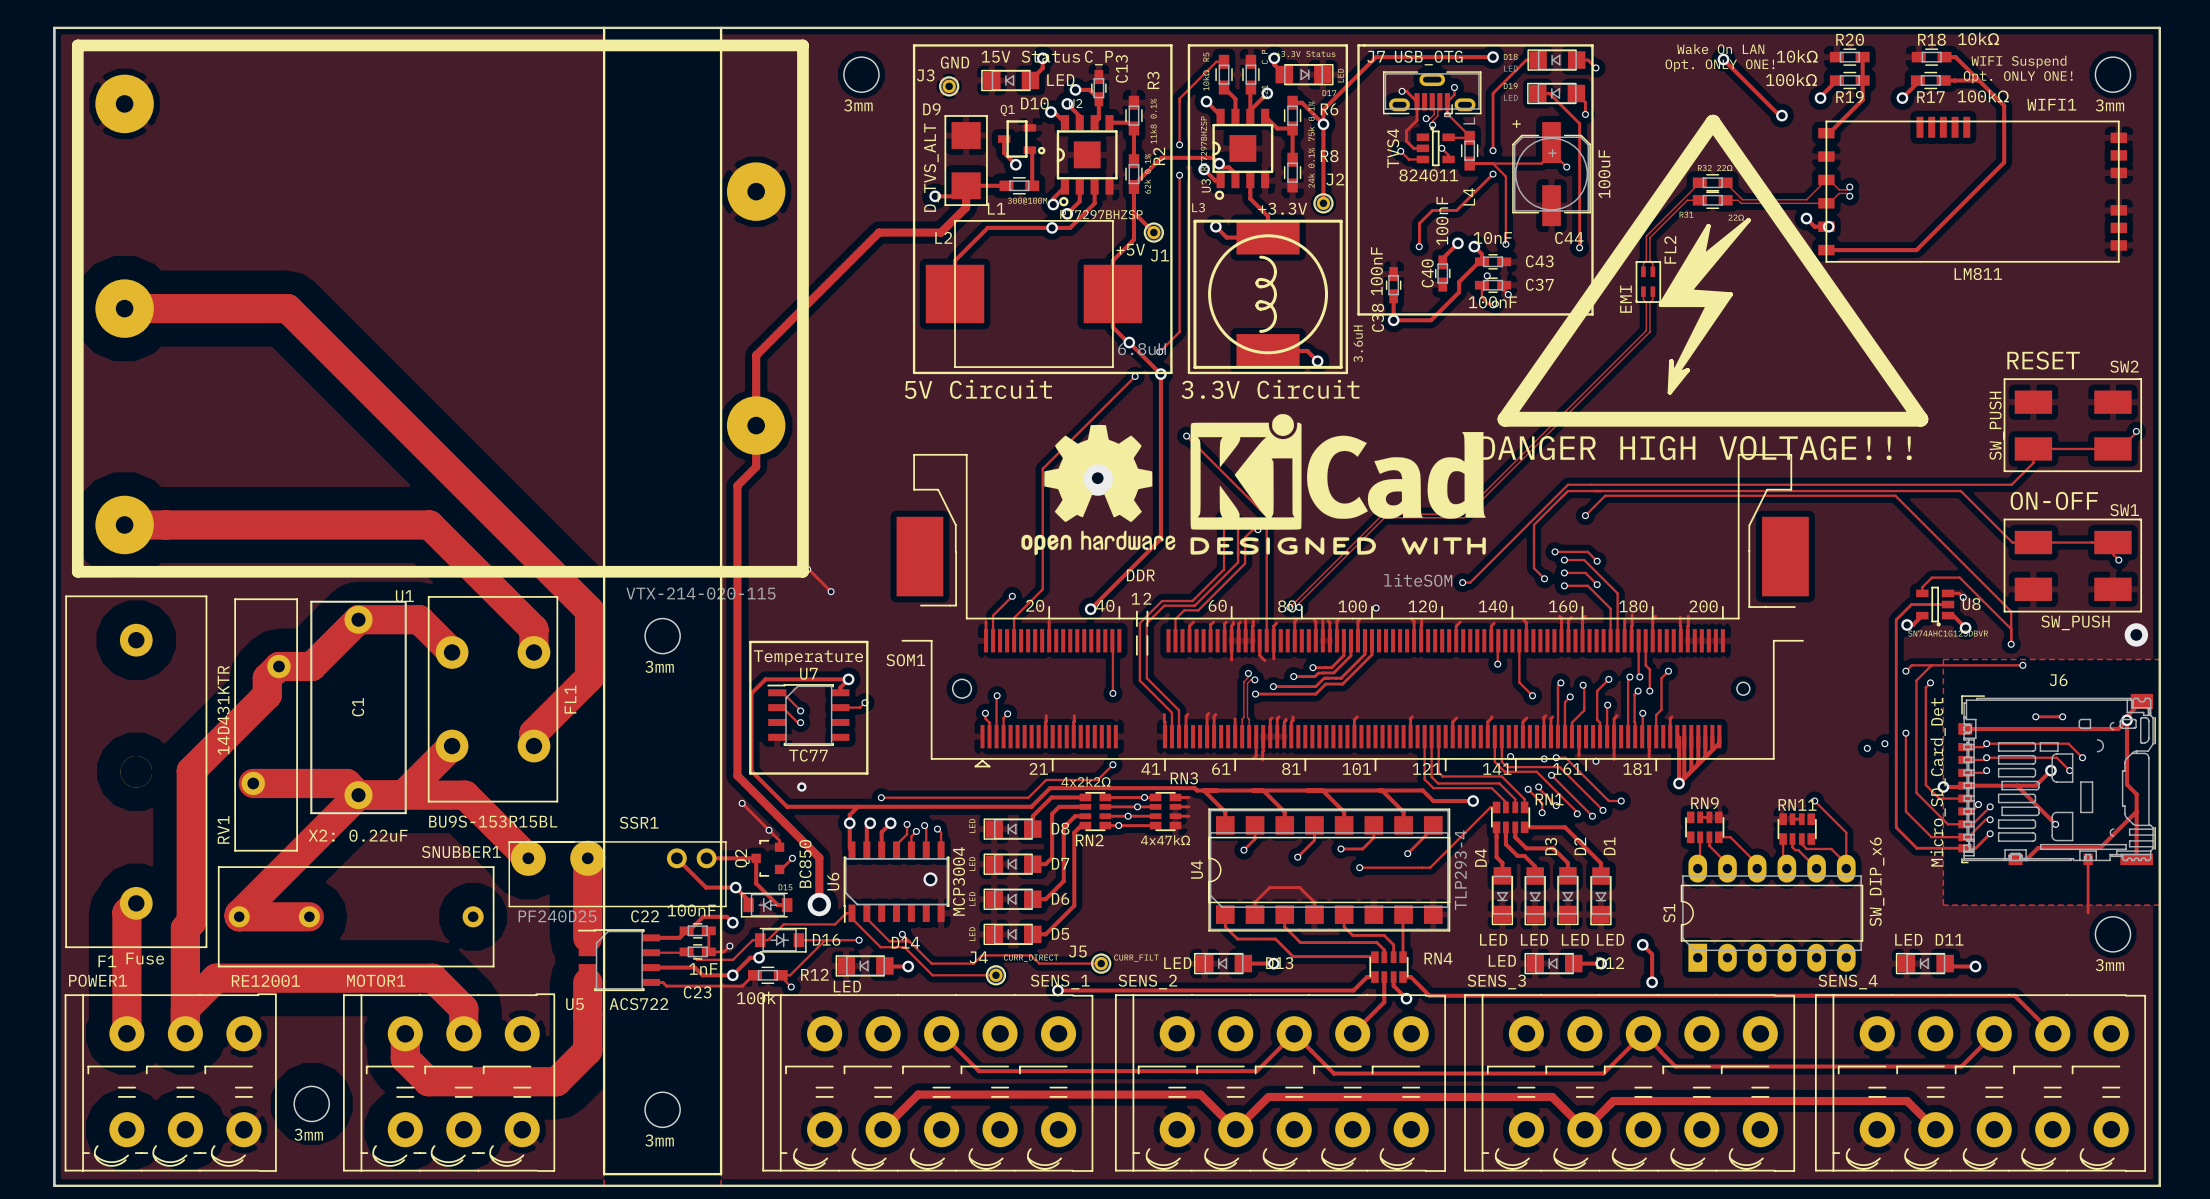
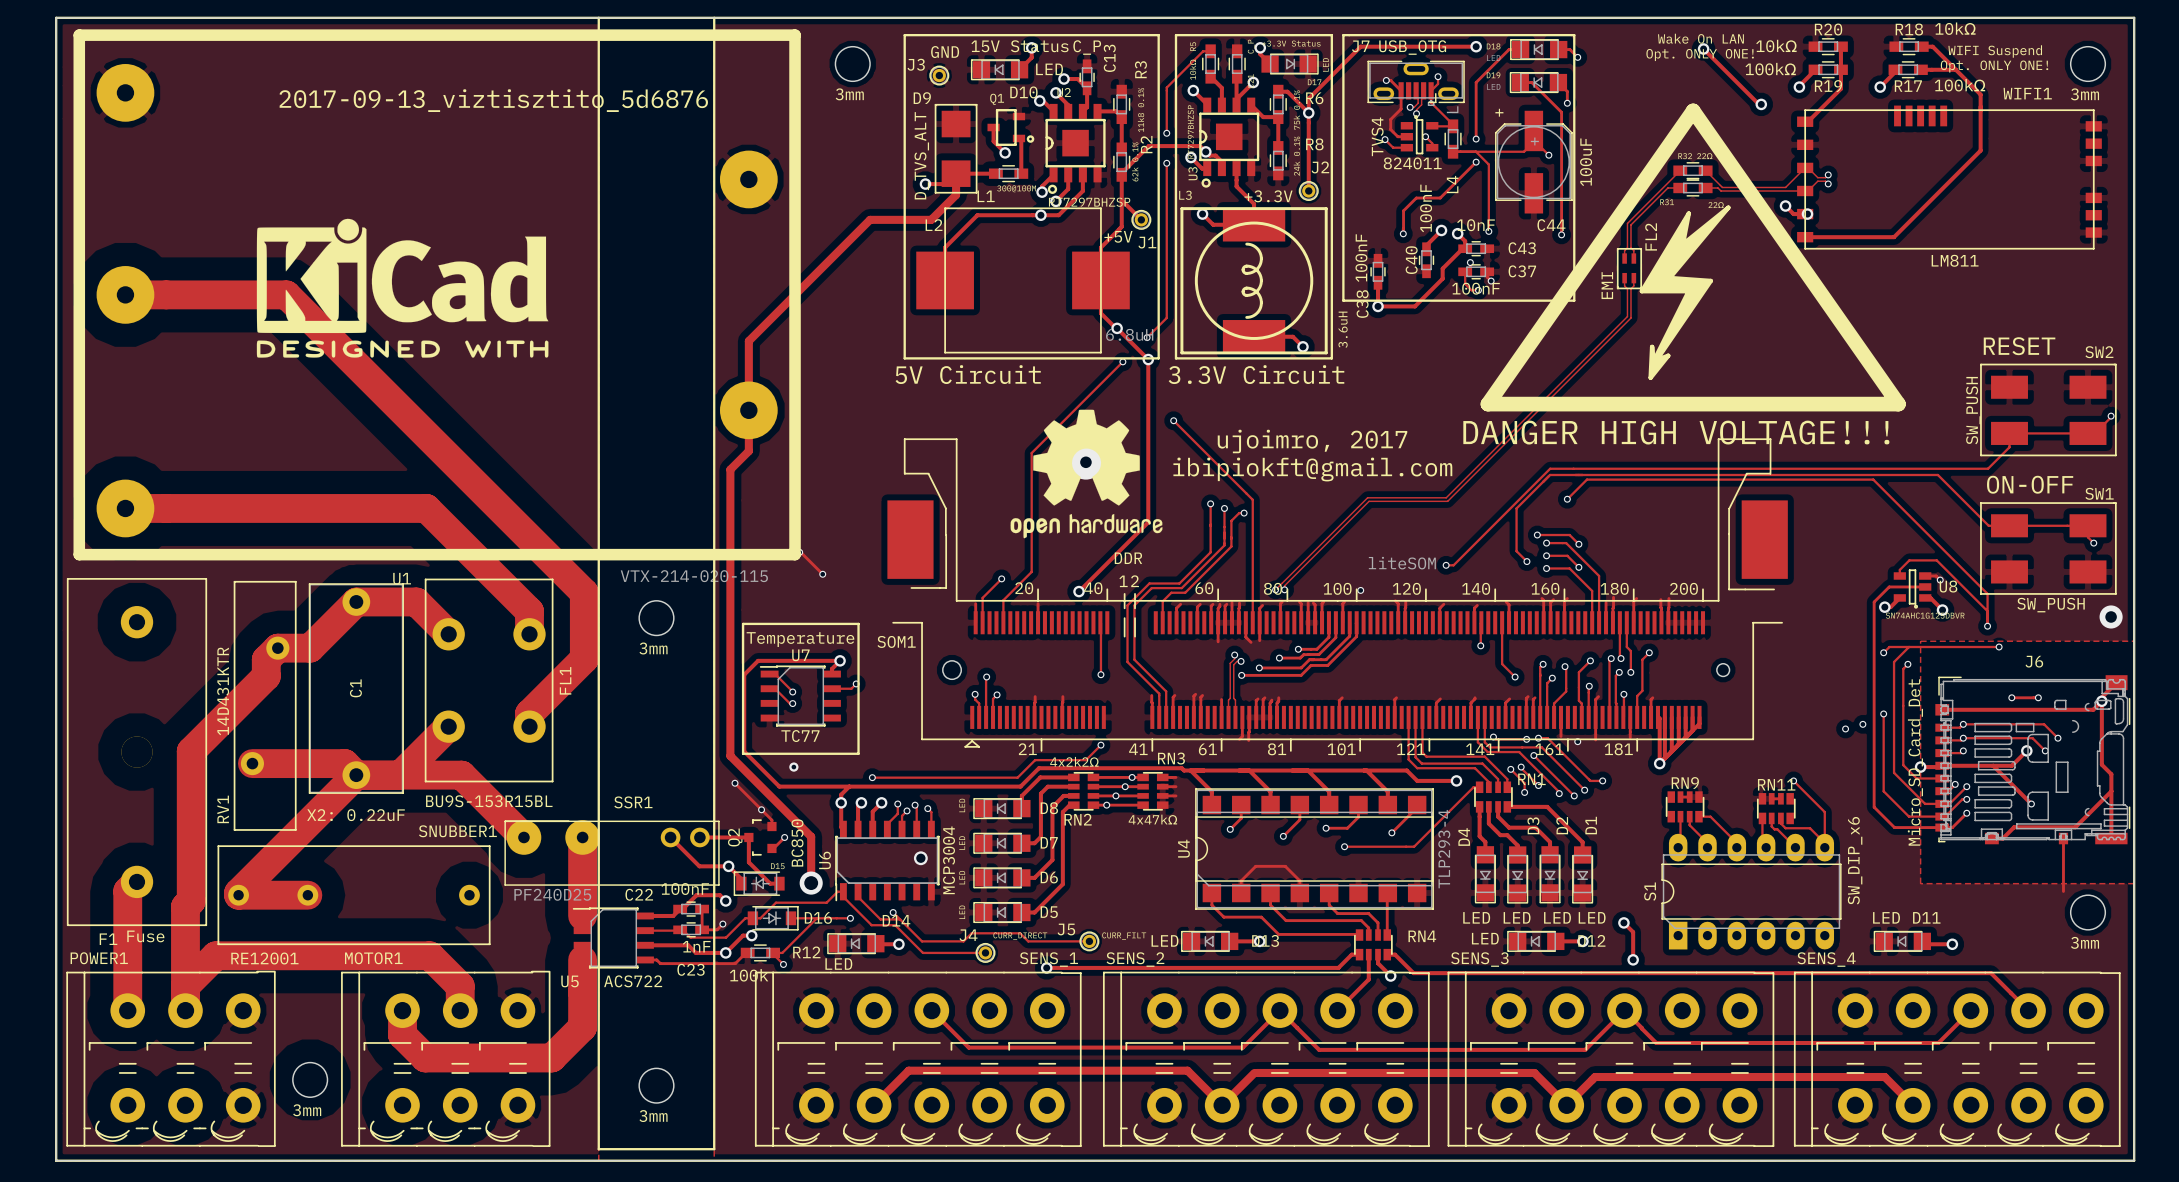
text: none -> 2017-09-13_viztisztito_5d6876 (493, 100)
drawing: none -> [256, 218, 549, 358]
drawing: [1190, 414, 1486, 555] -> none
text: none -> ujoimro, 2017 (1312, 441)
text: none -> ibipiokft@gmail.com (1312, 469)

